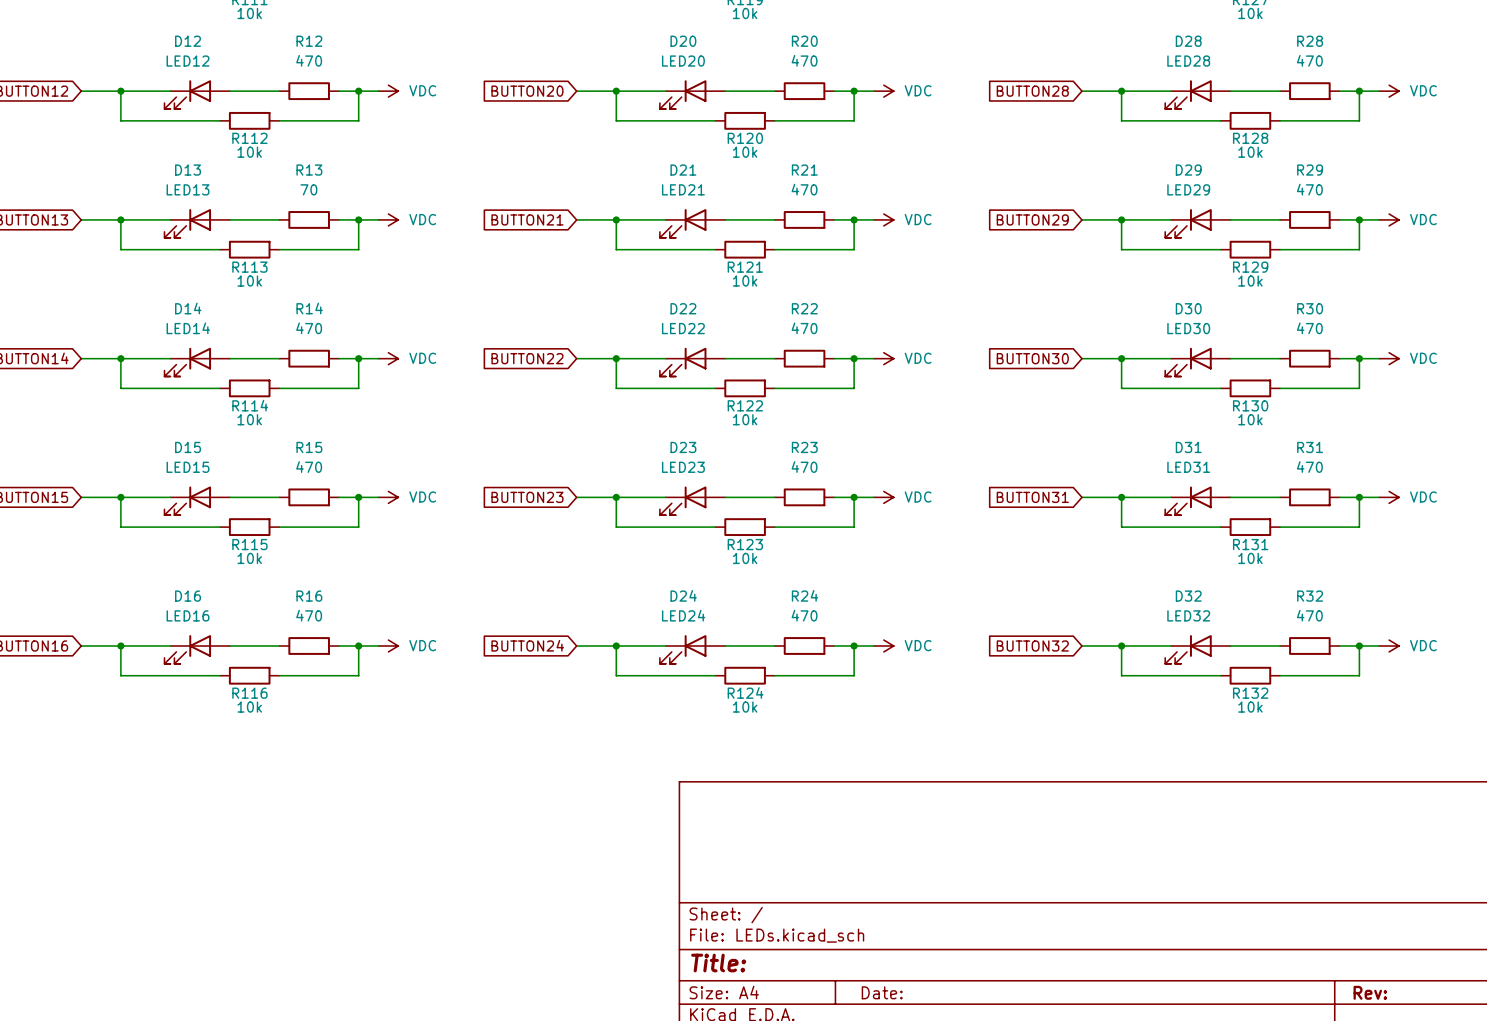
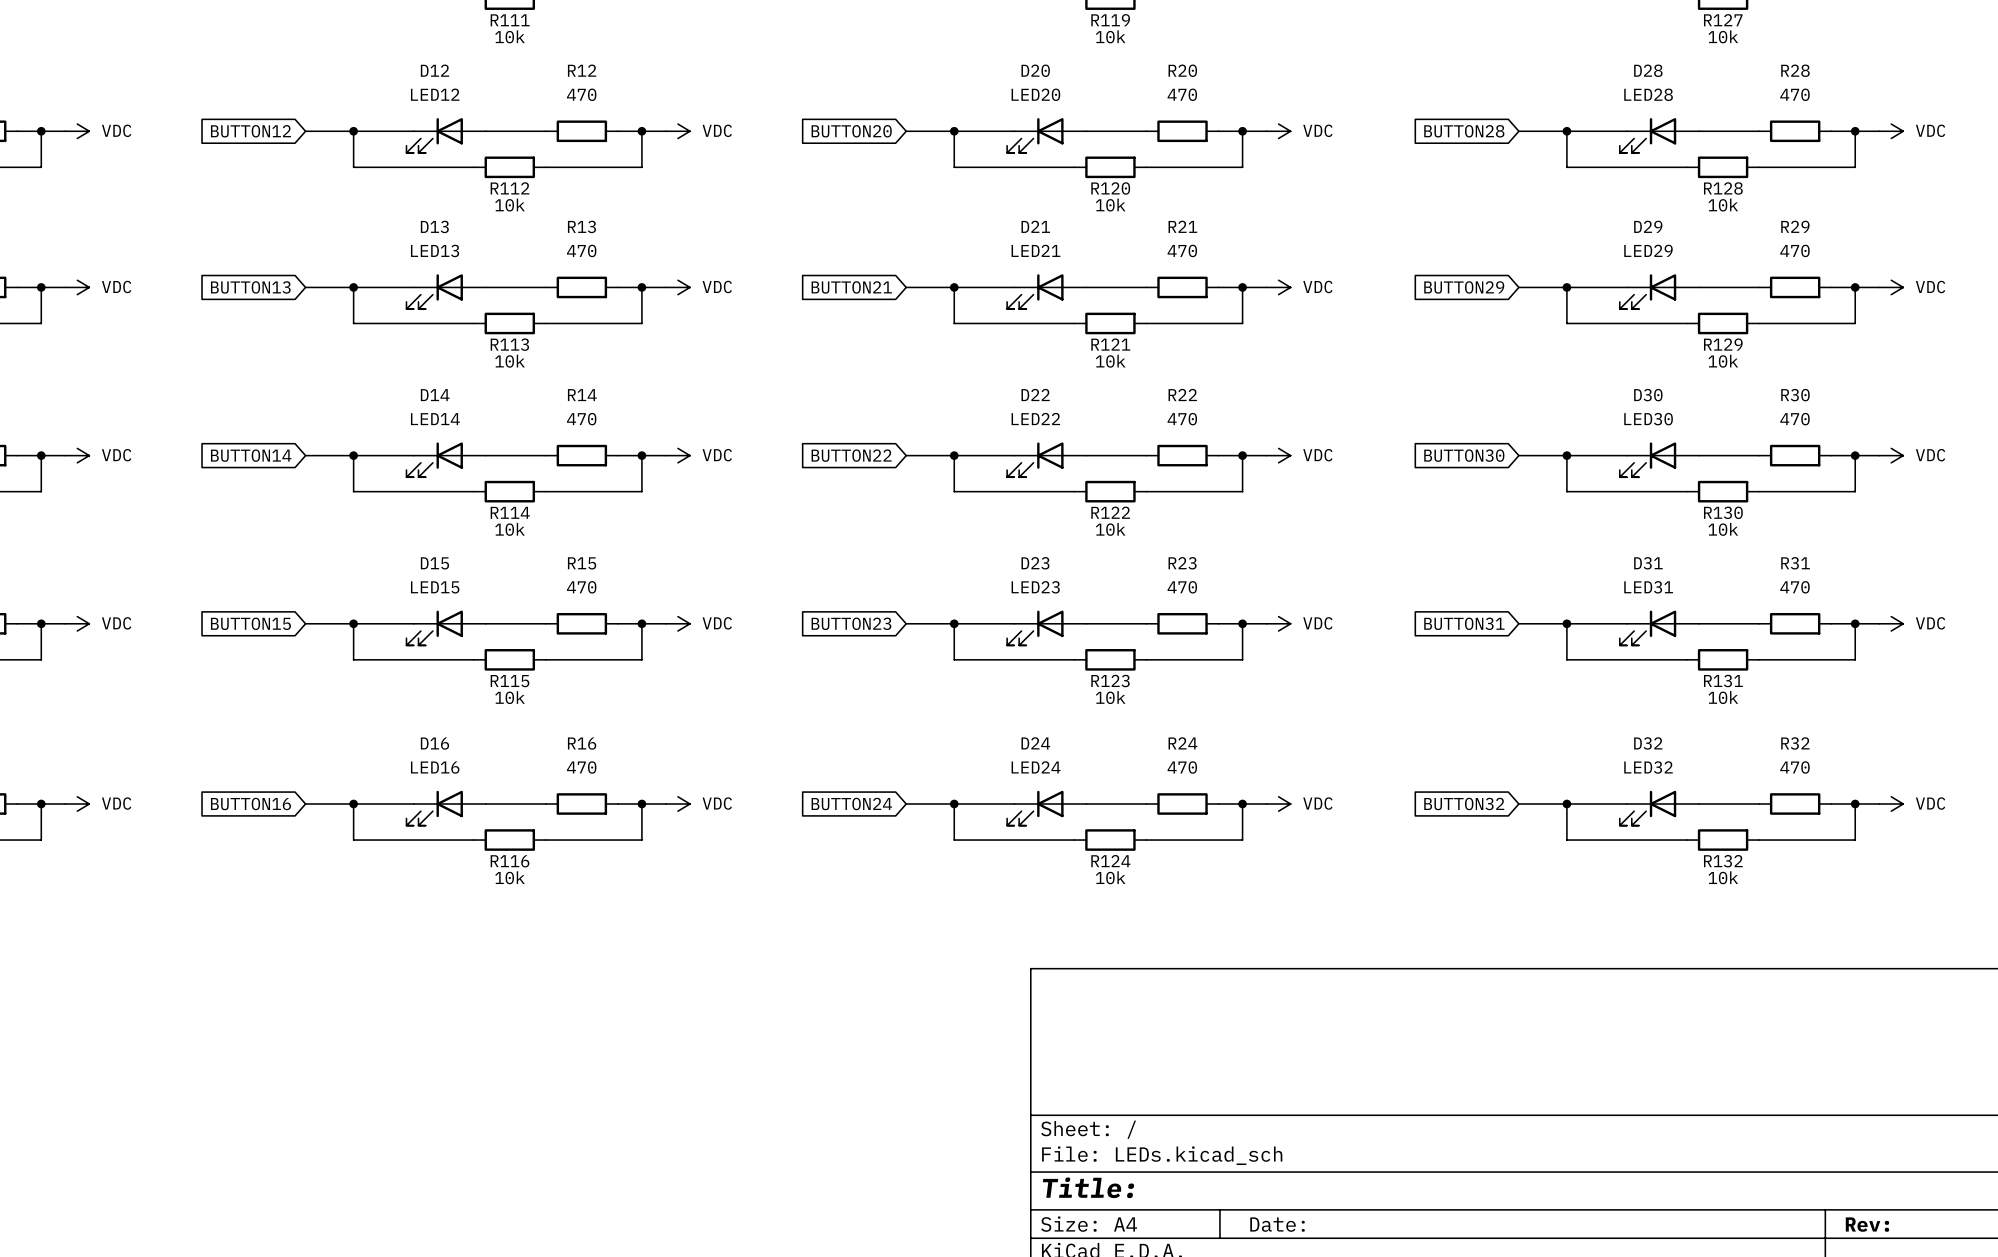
R13 value: 70 (308, 189) -> 470 (581, 250)

